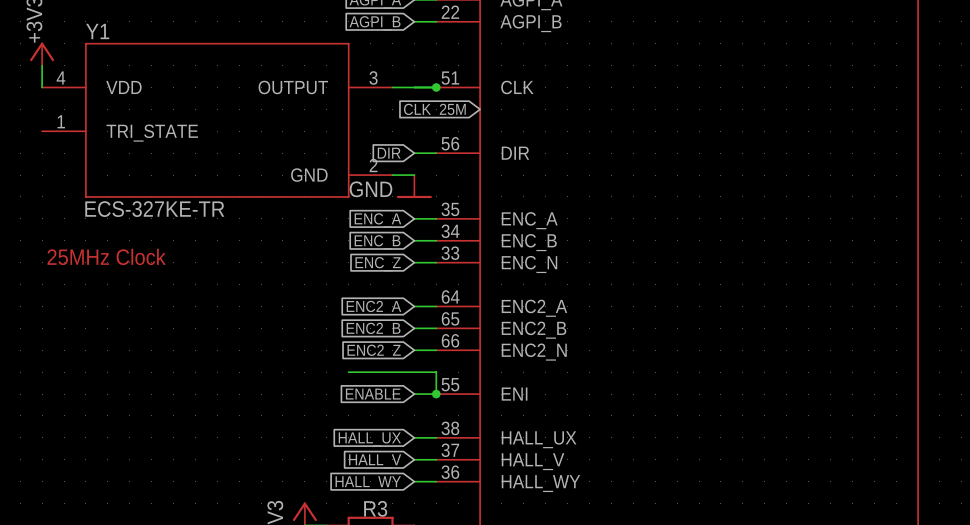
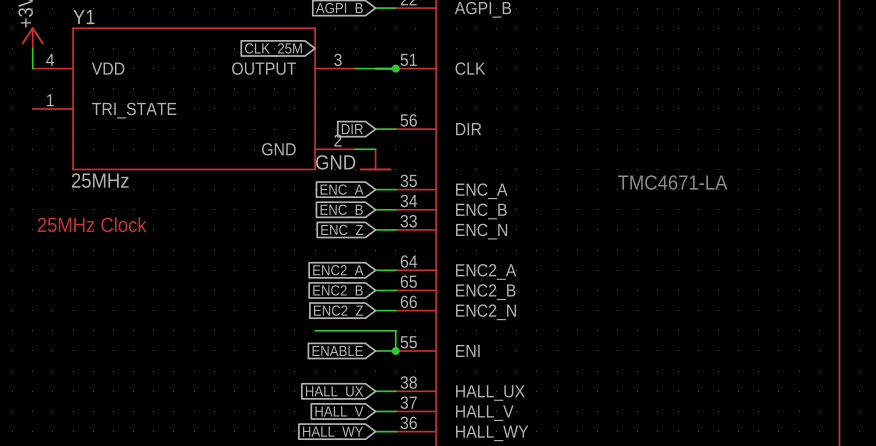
global label position: CLK_25M (434, 110) -> CLK_25M (273, 49)
Y1 value: ECS-327KE-TR (154, 209) -> 25MHz (100, 180)
text: none -> TMC4671-LA (672, 182)

